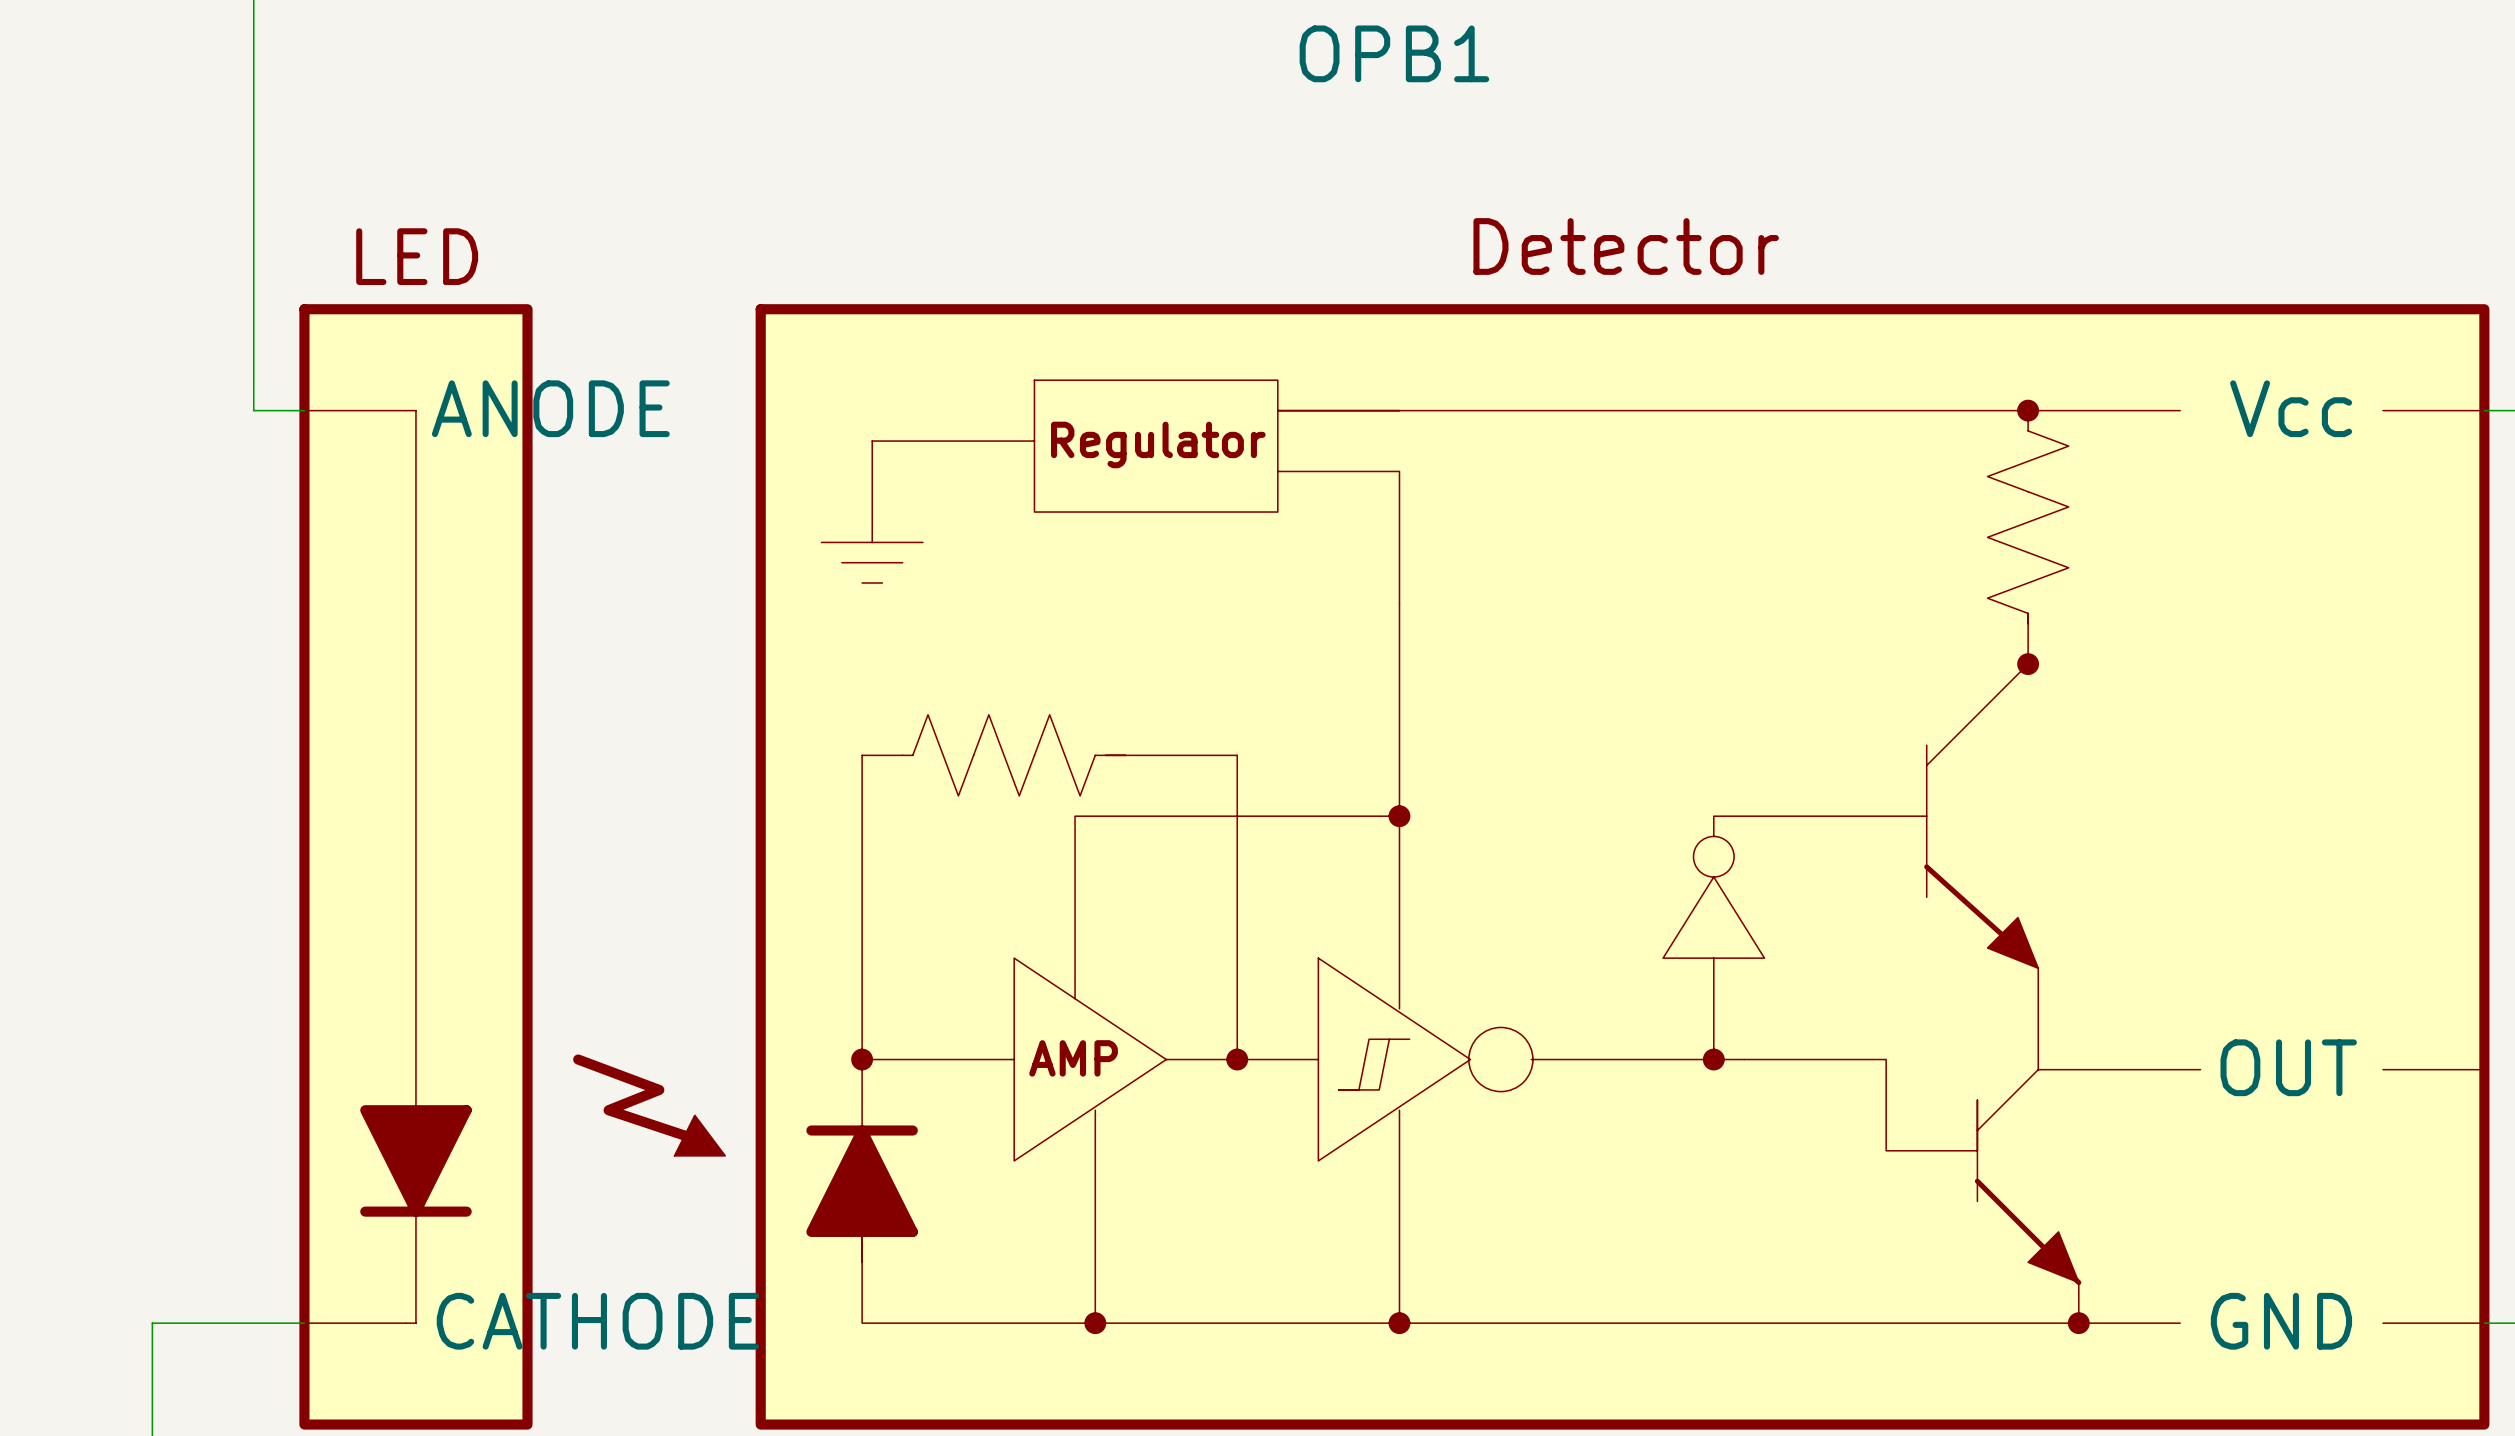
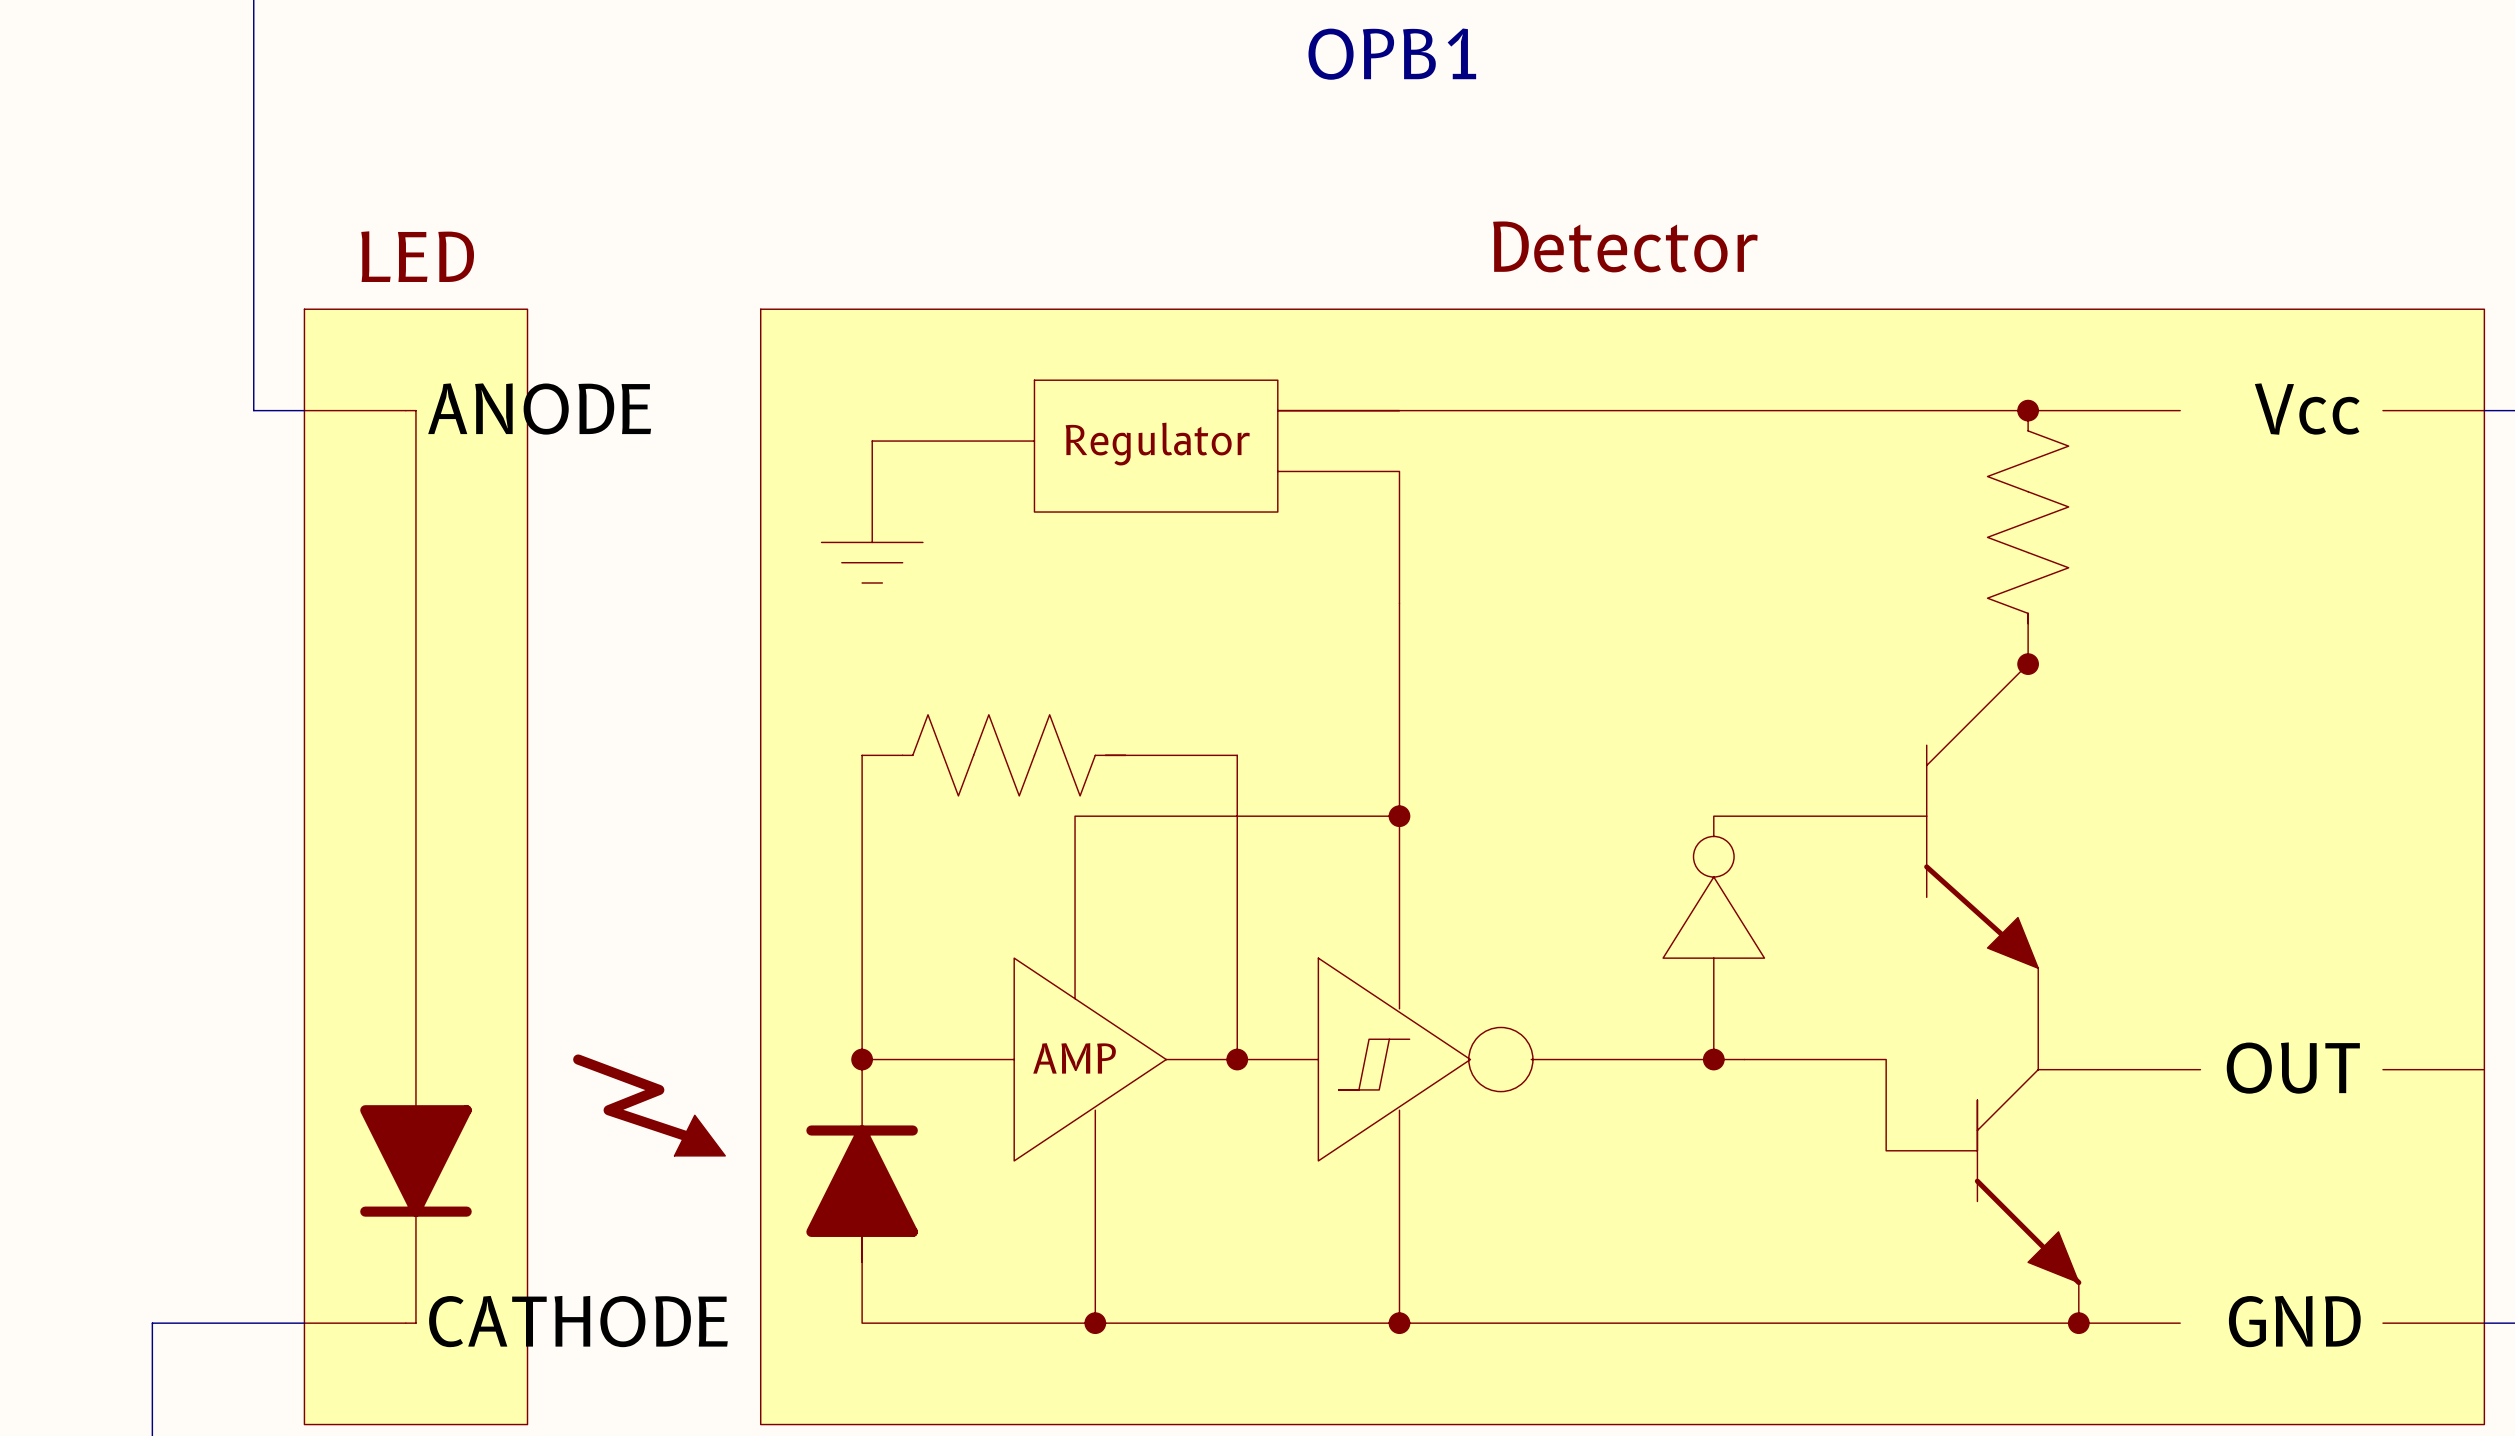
OPB1 symbol: [299, 304, 2490, 1430] -> [304, 309, 2485, 1425]

